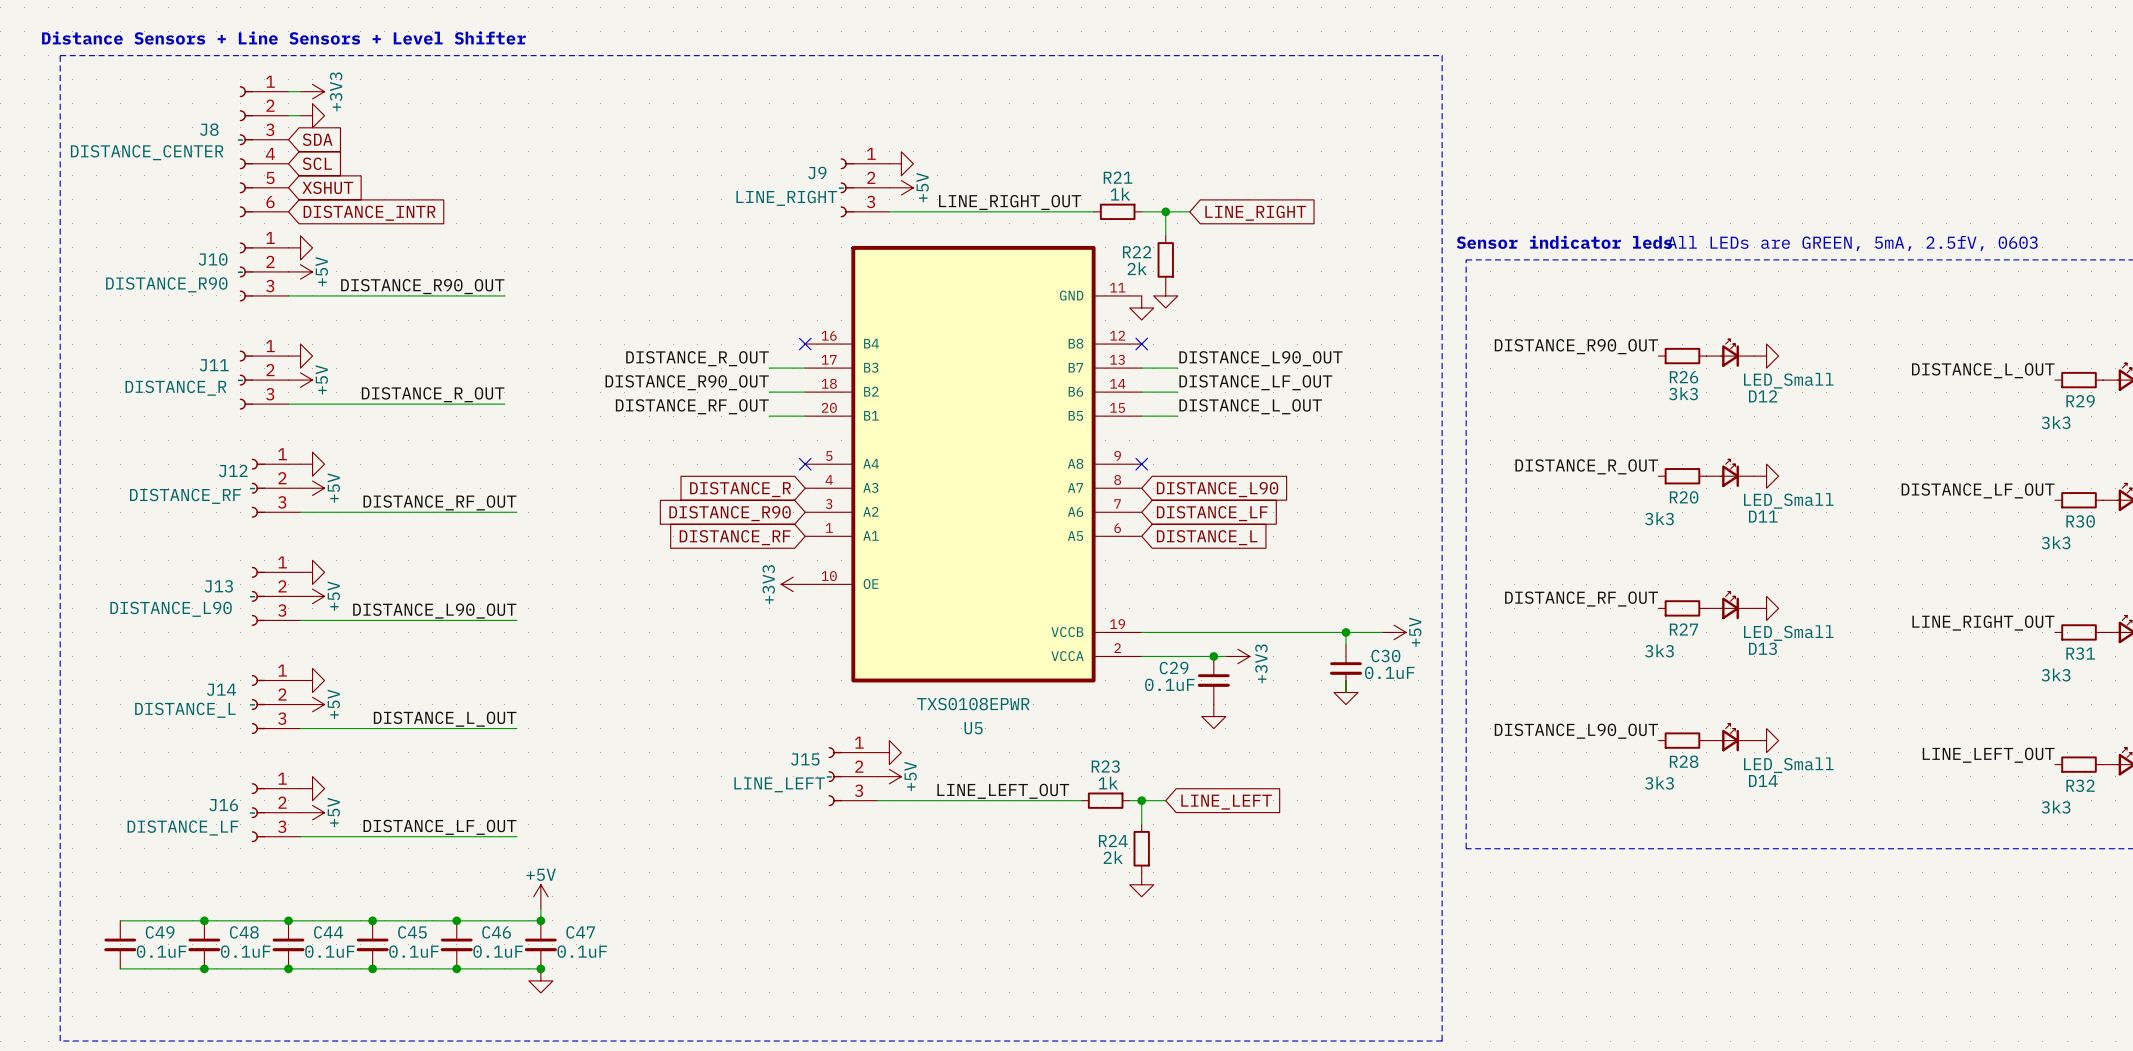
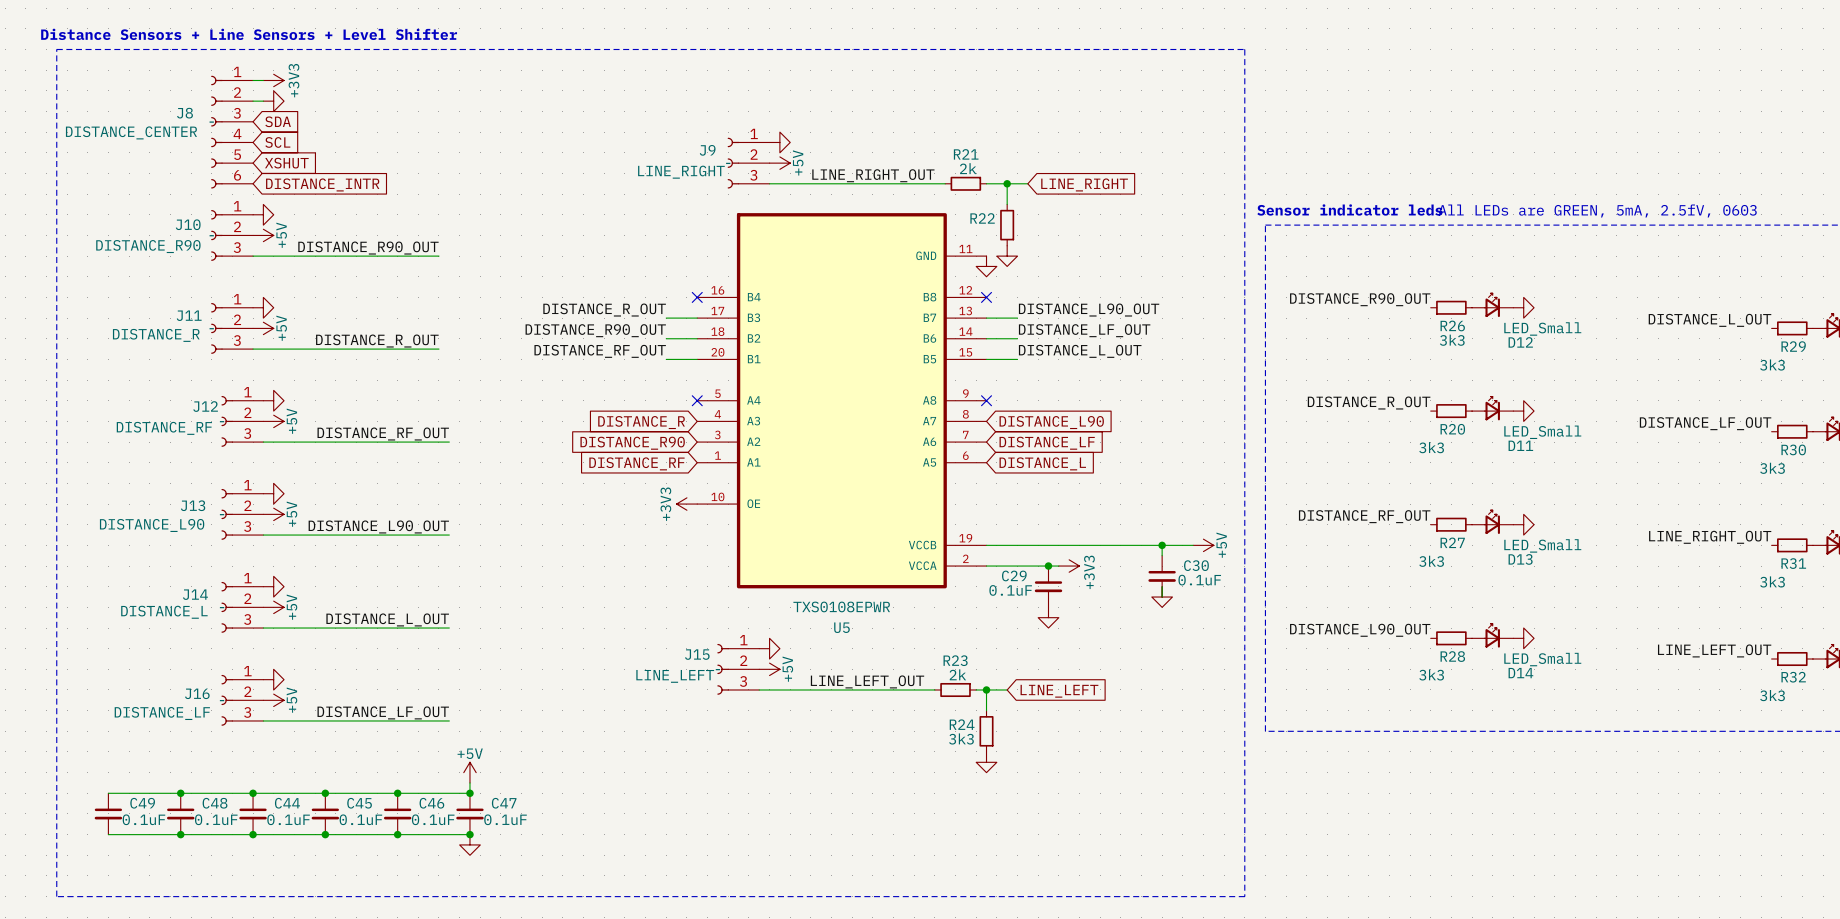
R21 value: 1k (1120, 194) -> 2k (968, 168)
R22 value: 2k (1137, 268) -> none
R23 value: 1k (1108, 783) -> 2k (957, 674)
R24 value: 2k (1113, 857) -> 3k3 (961, 738)

